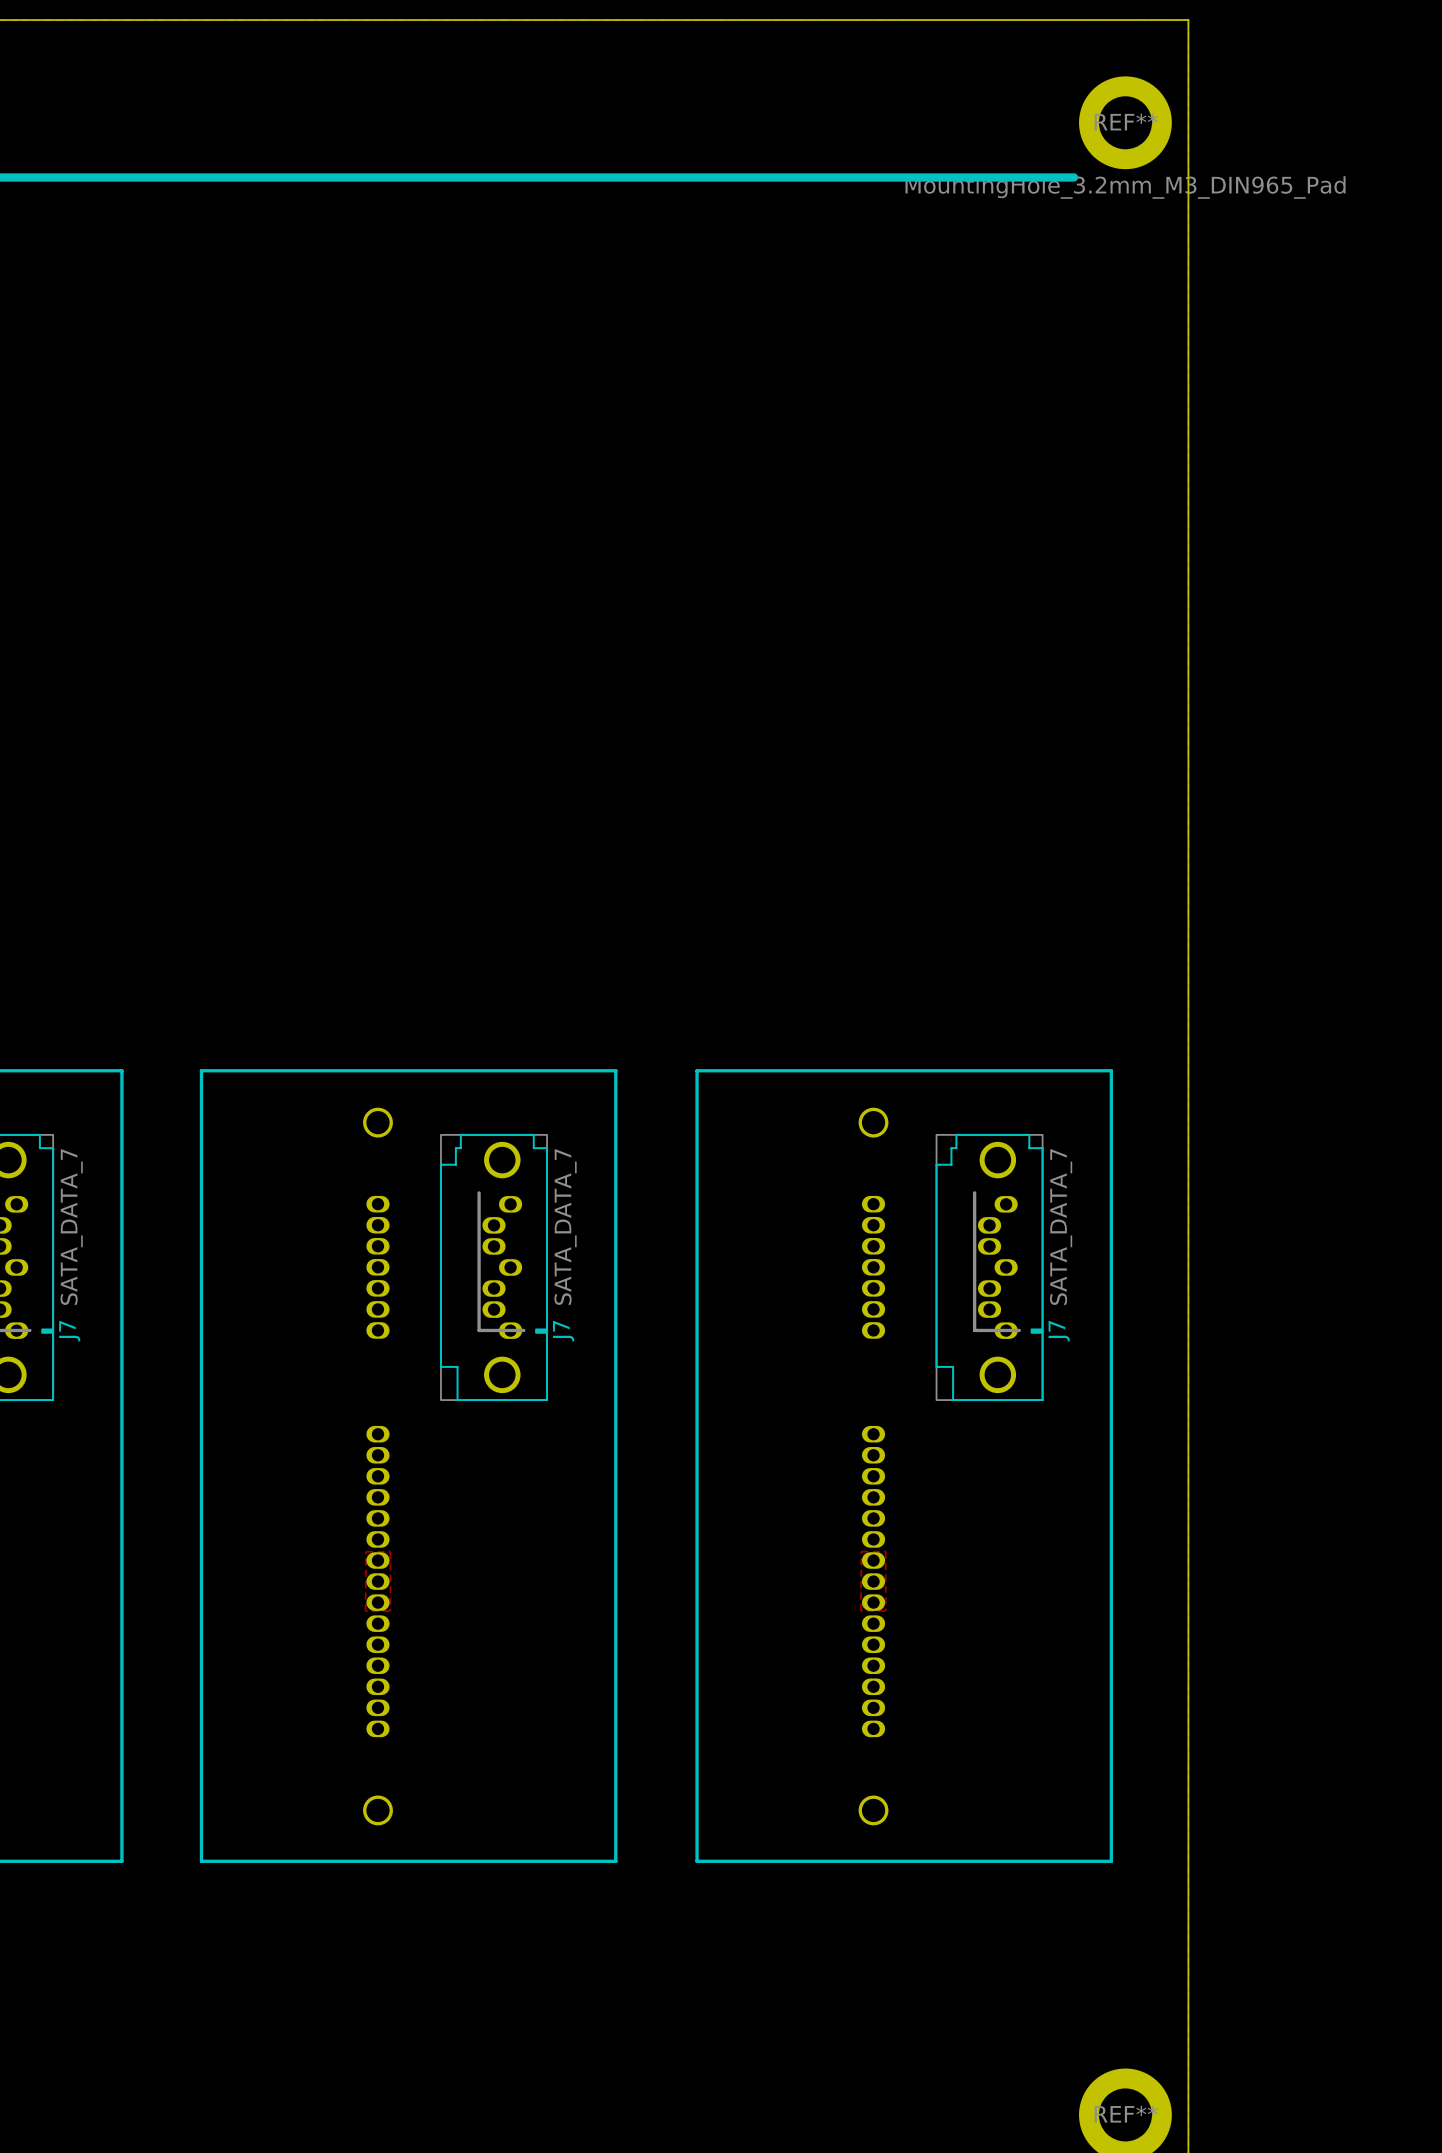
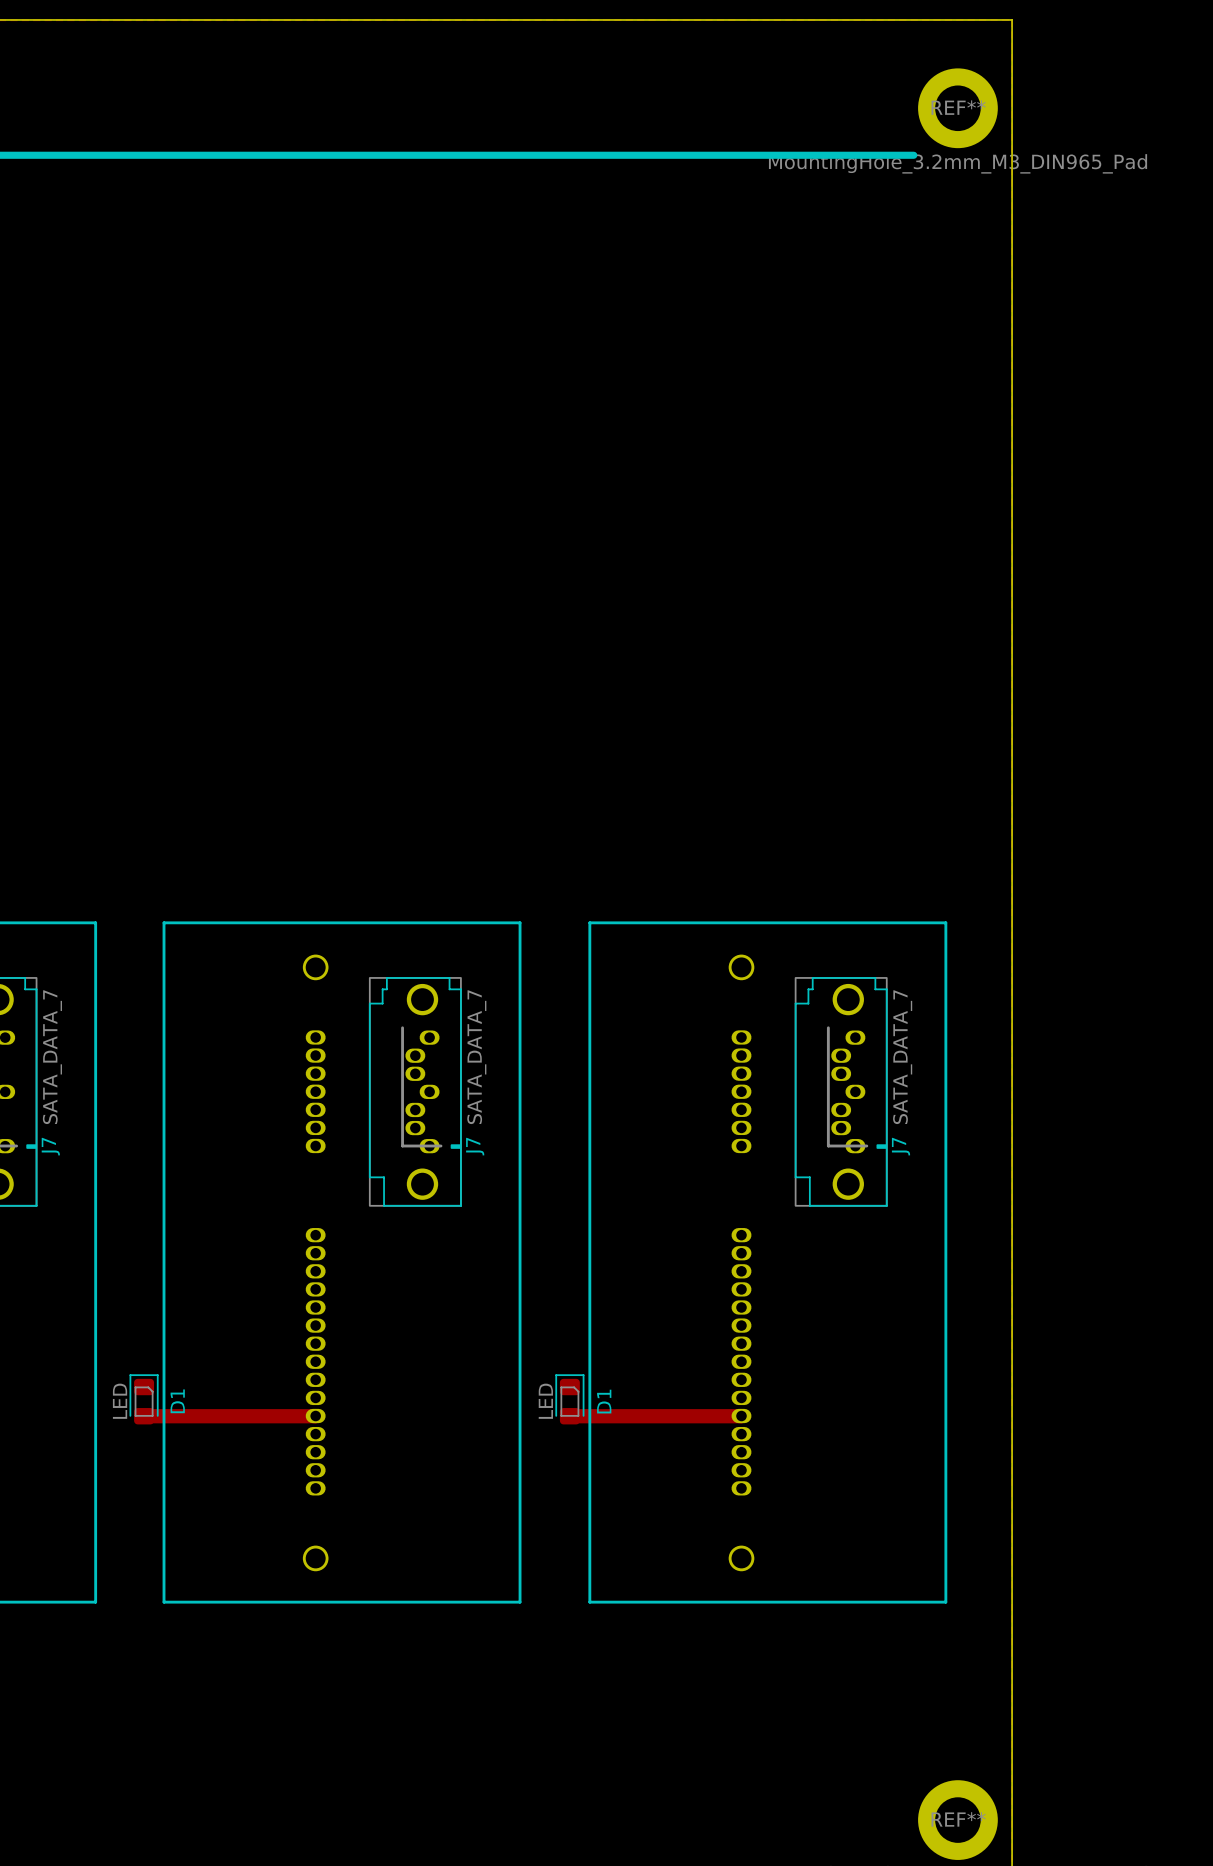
zone outline: (366, 1551) (390, 1551) (390, 1611) (365, 1611) (366, 1551) -> none
zone outline: (861, 1551) (885, 1551) (885, 1610) (860, 1610) (861, 1551) -> none
D1: none -> LED (144, 1399)
D1: none -> LED (569, 1399)
track: none -> (144, 1416) (315, 1416)
track: none -> (569, 1416) (741, 1416)

